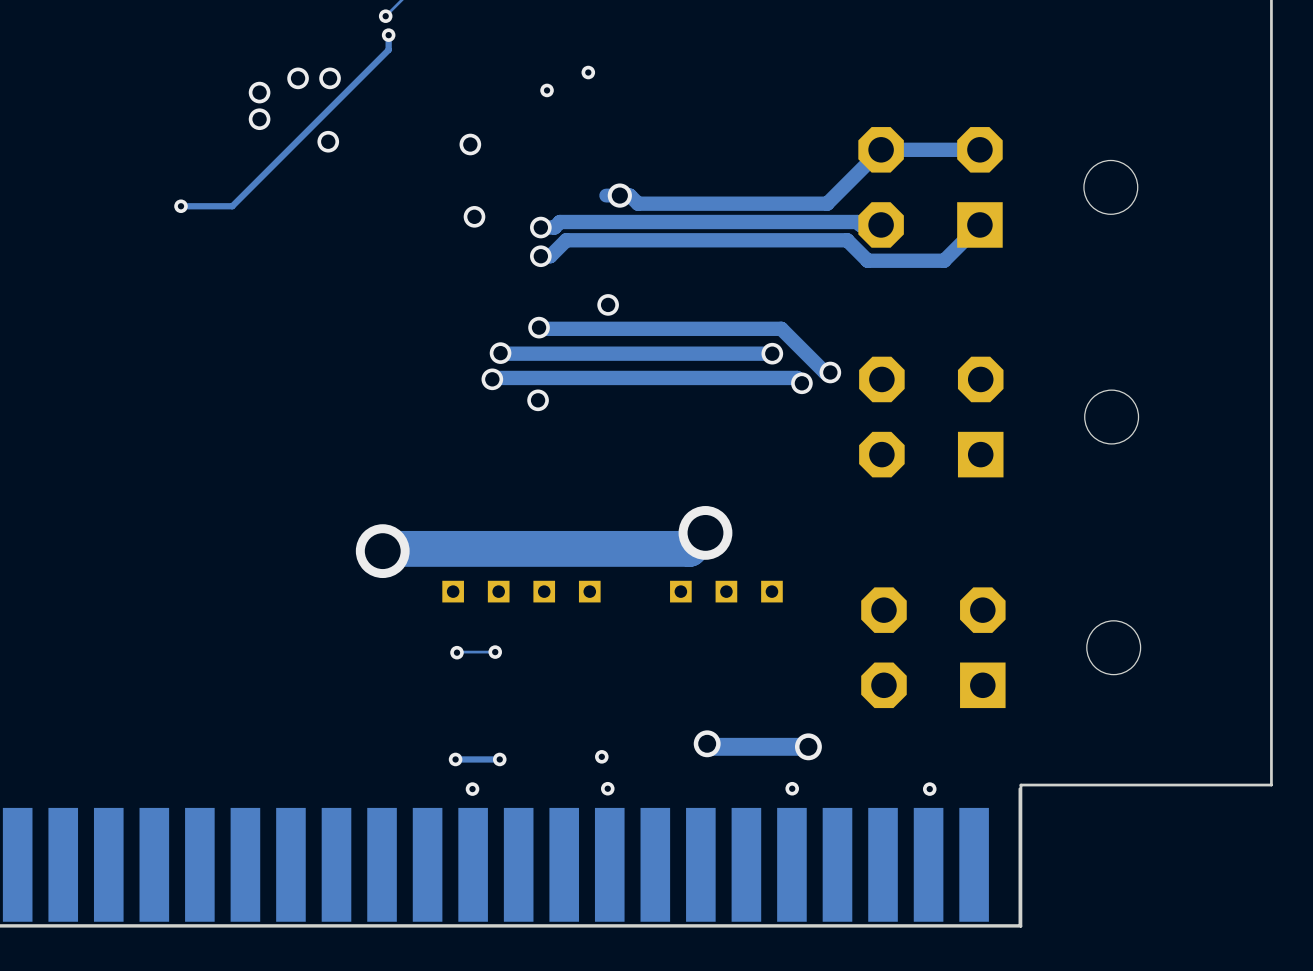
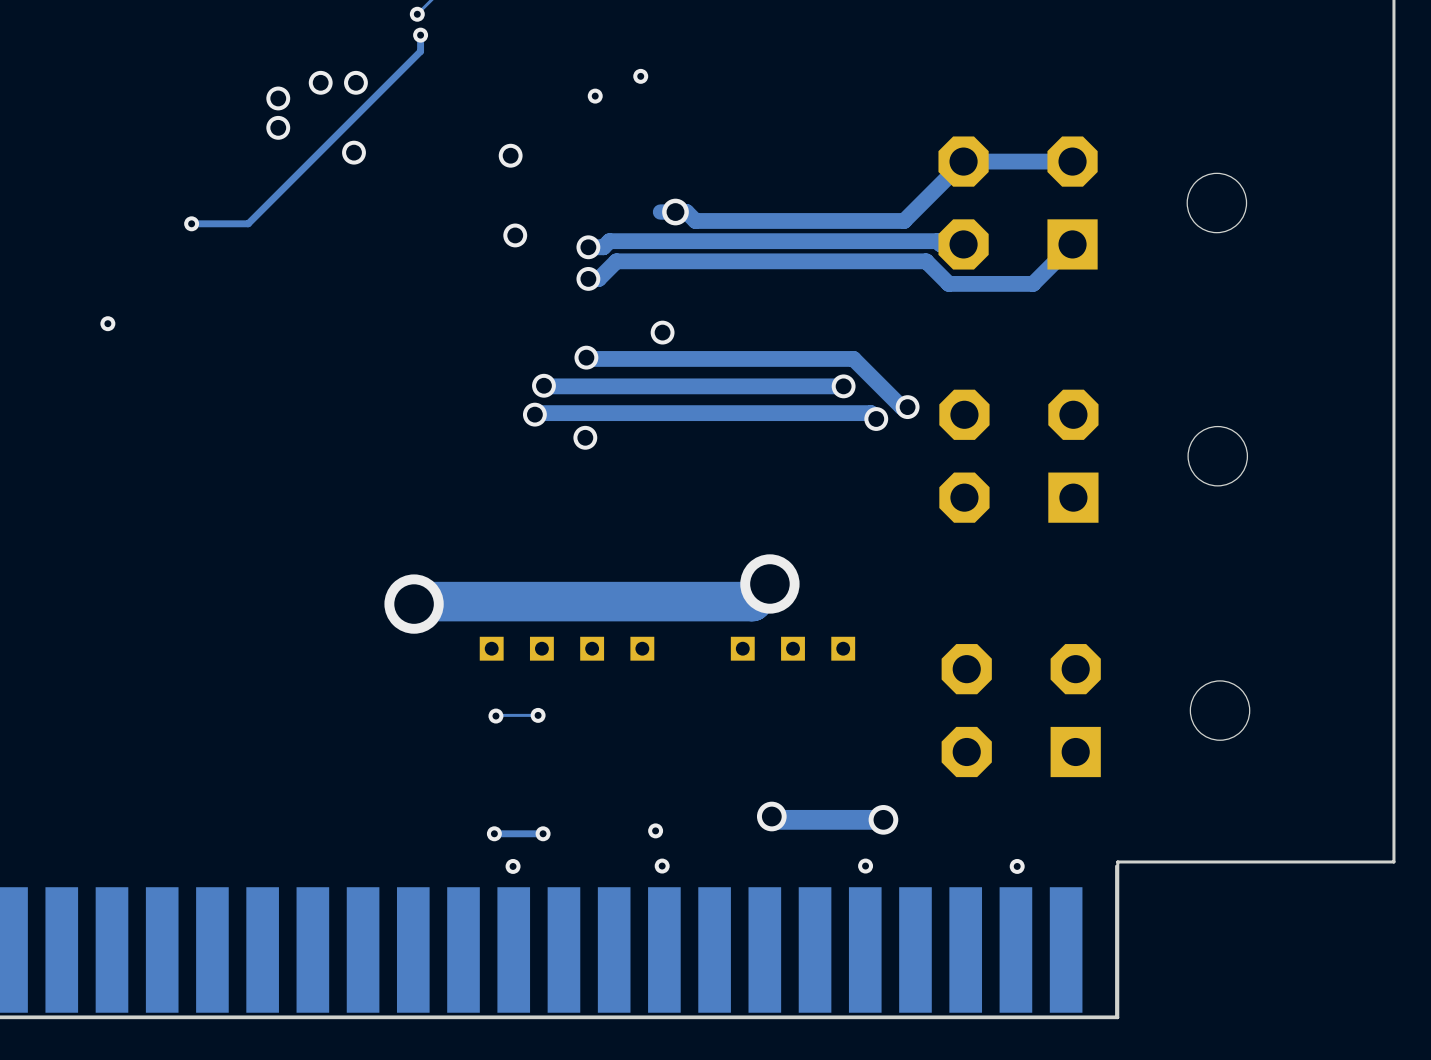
via: none -> (107, 323)

